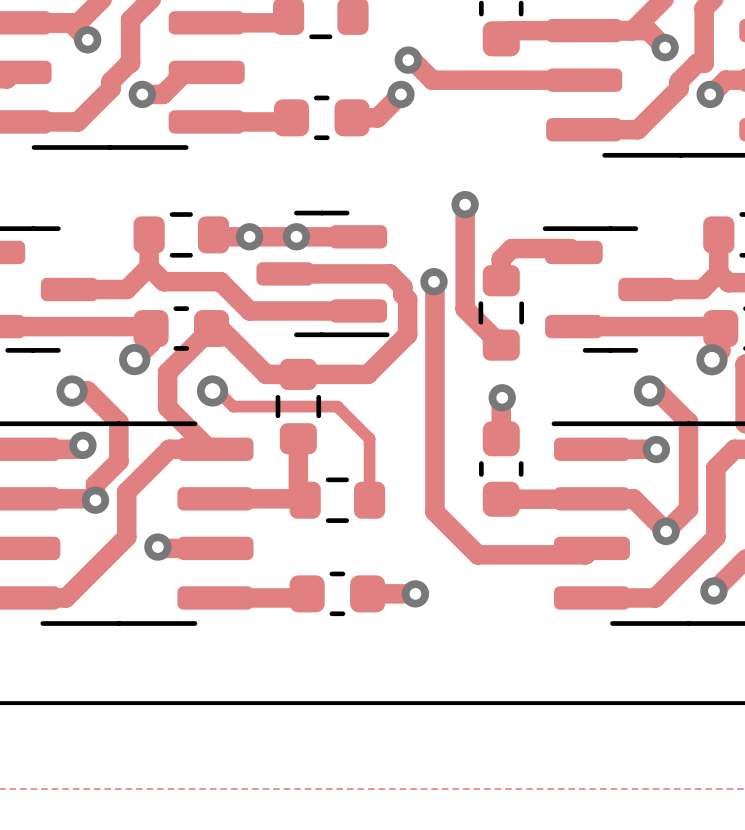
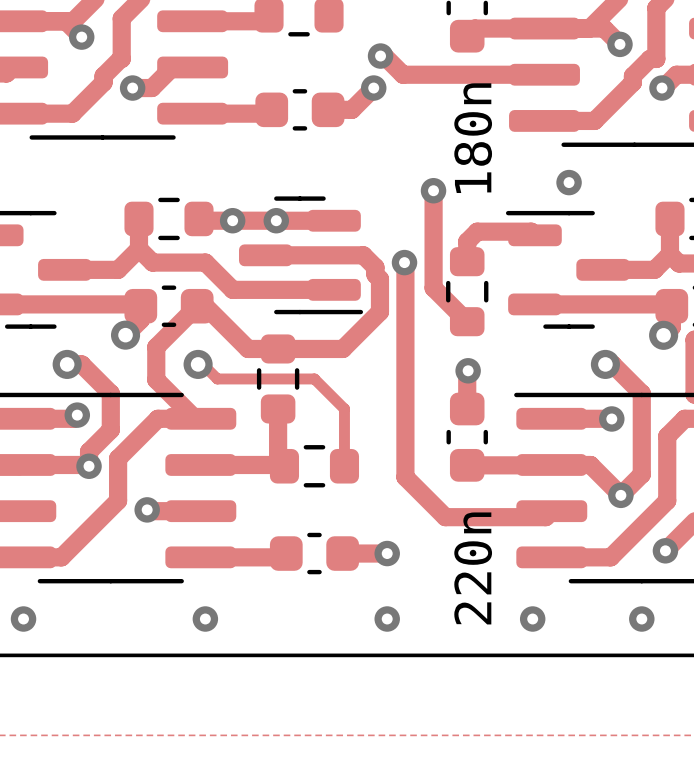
part value: none -> 180n (473, 138)
via: none -> (569, 182)
part value: none -> 220n (473, 568)
via: none -> (23, 619)
via: none -> (205, 619)
via: none -> (387, 619)
via: none -> (532, 619)
via: none -> (641, 619)

